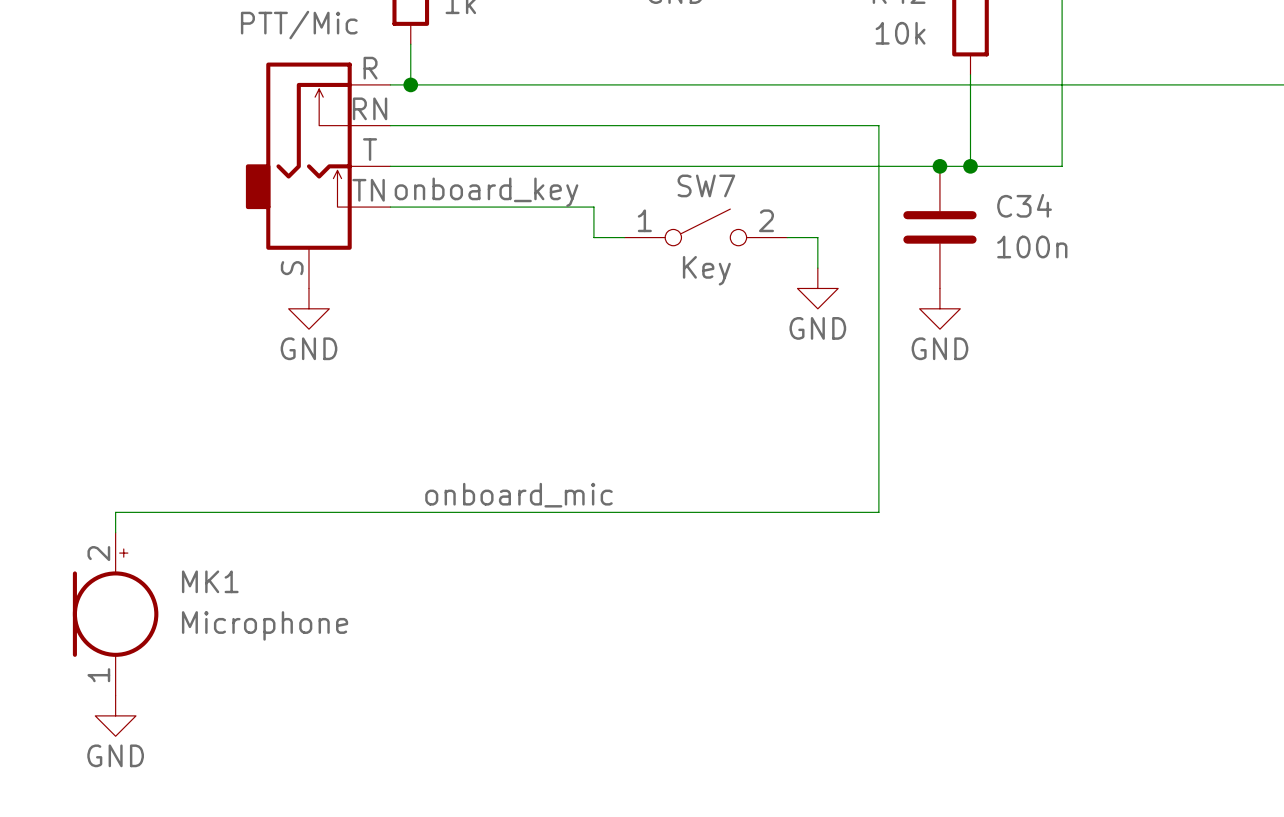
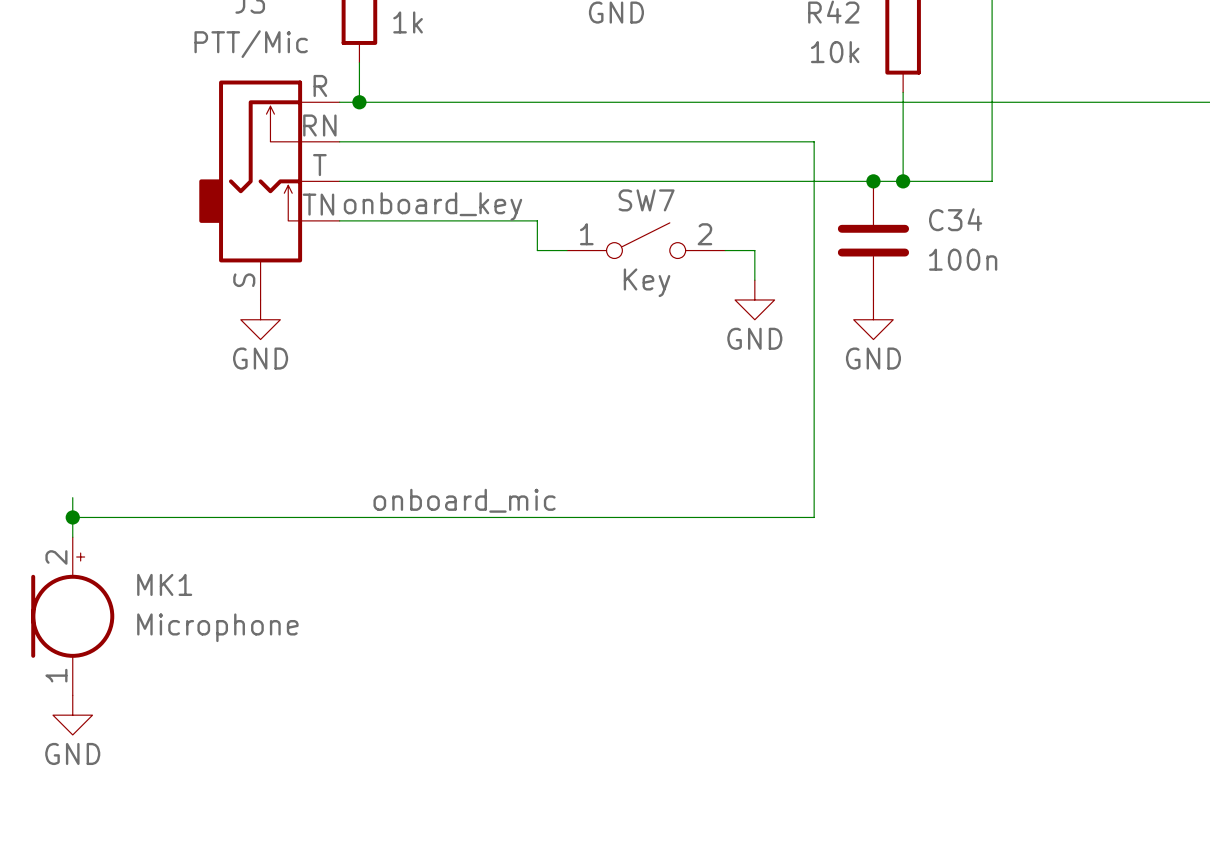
wire: none -> (72, 497) (72, 517)
junction: none -> (72, 517)

